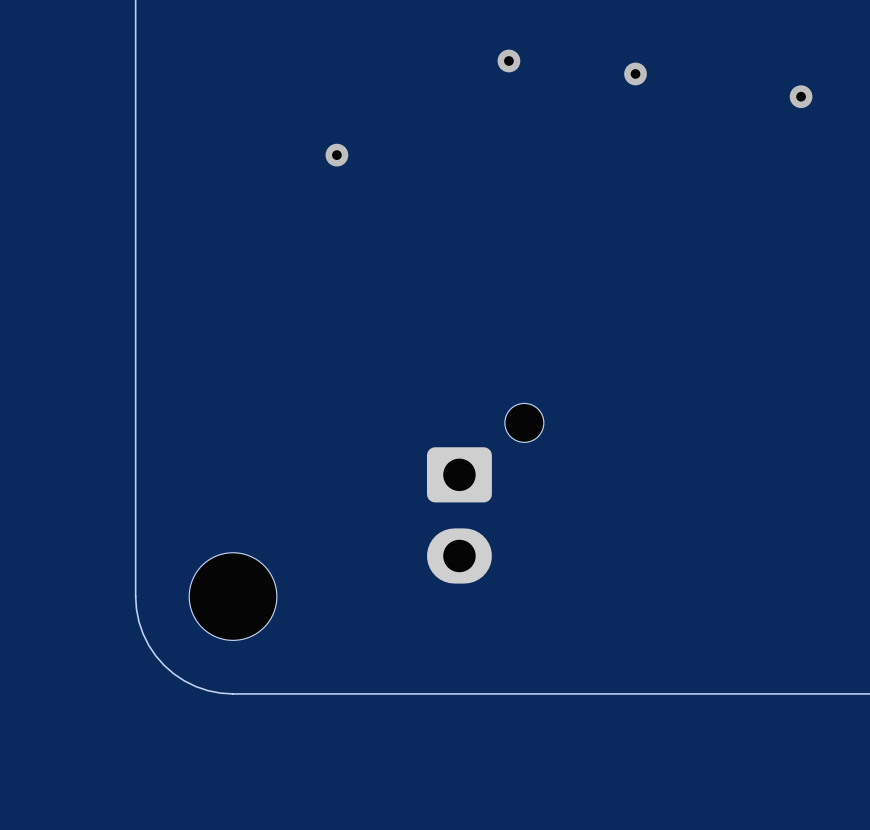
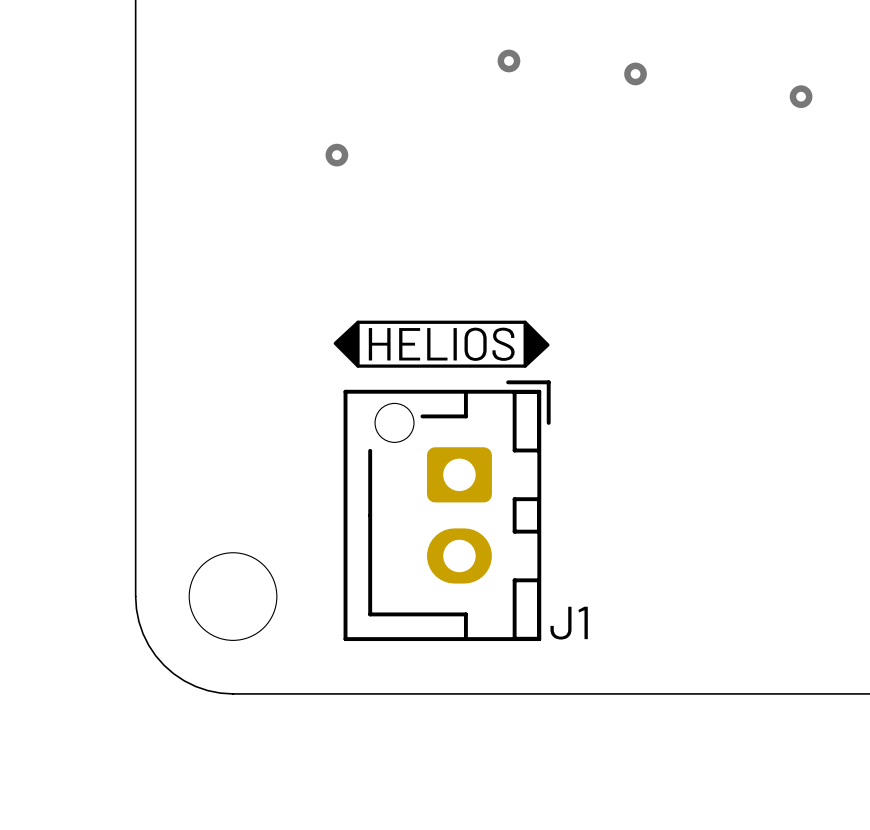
drawing: none -> [333, 320, 360, 368]
drawing: none -> [523, 320, 550, 368]
line: none -> (525, 322) (358, 322)
text: none -> HELIOS (441, 344)
line: none -> (525, 366) (358, 366)
J1 side: top (485, 493) -> bottom (447, 510)

